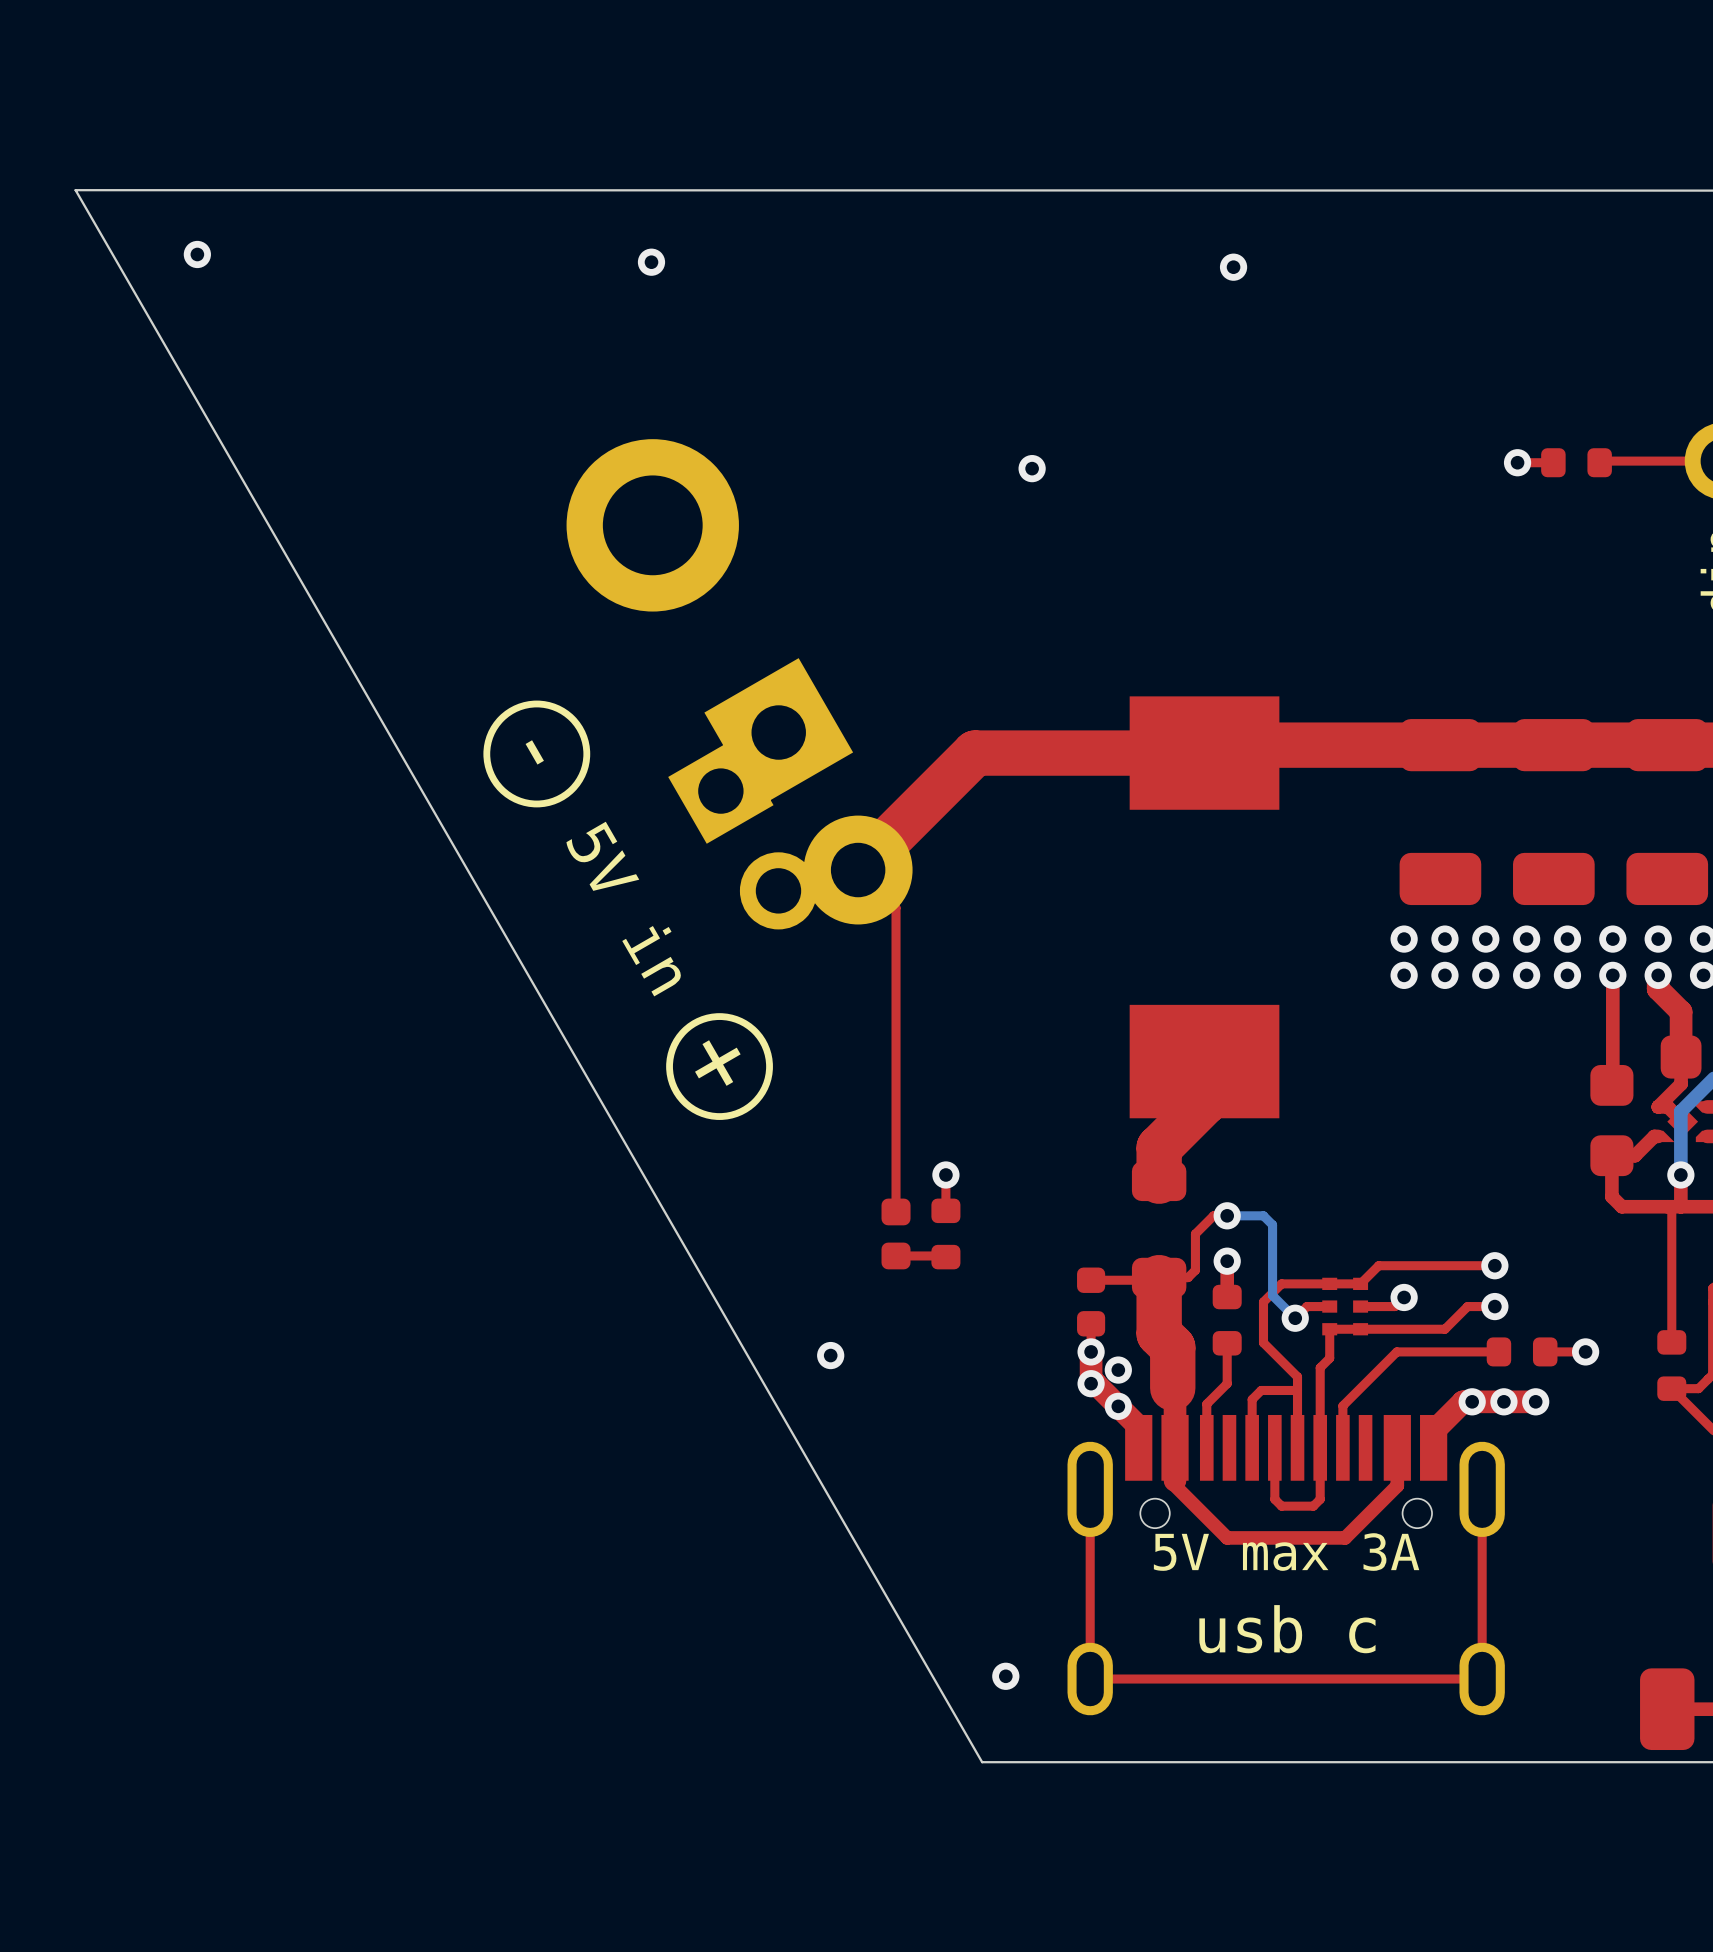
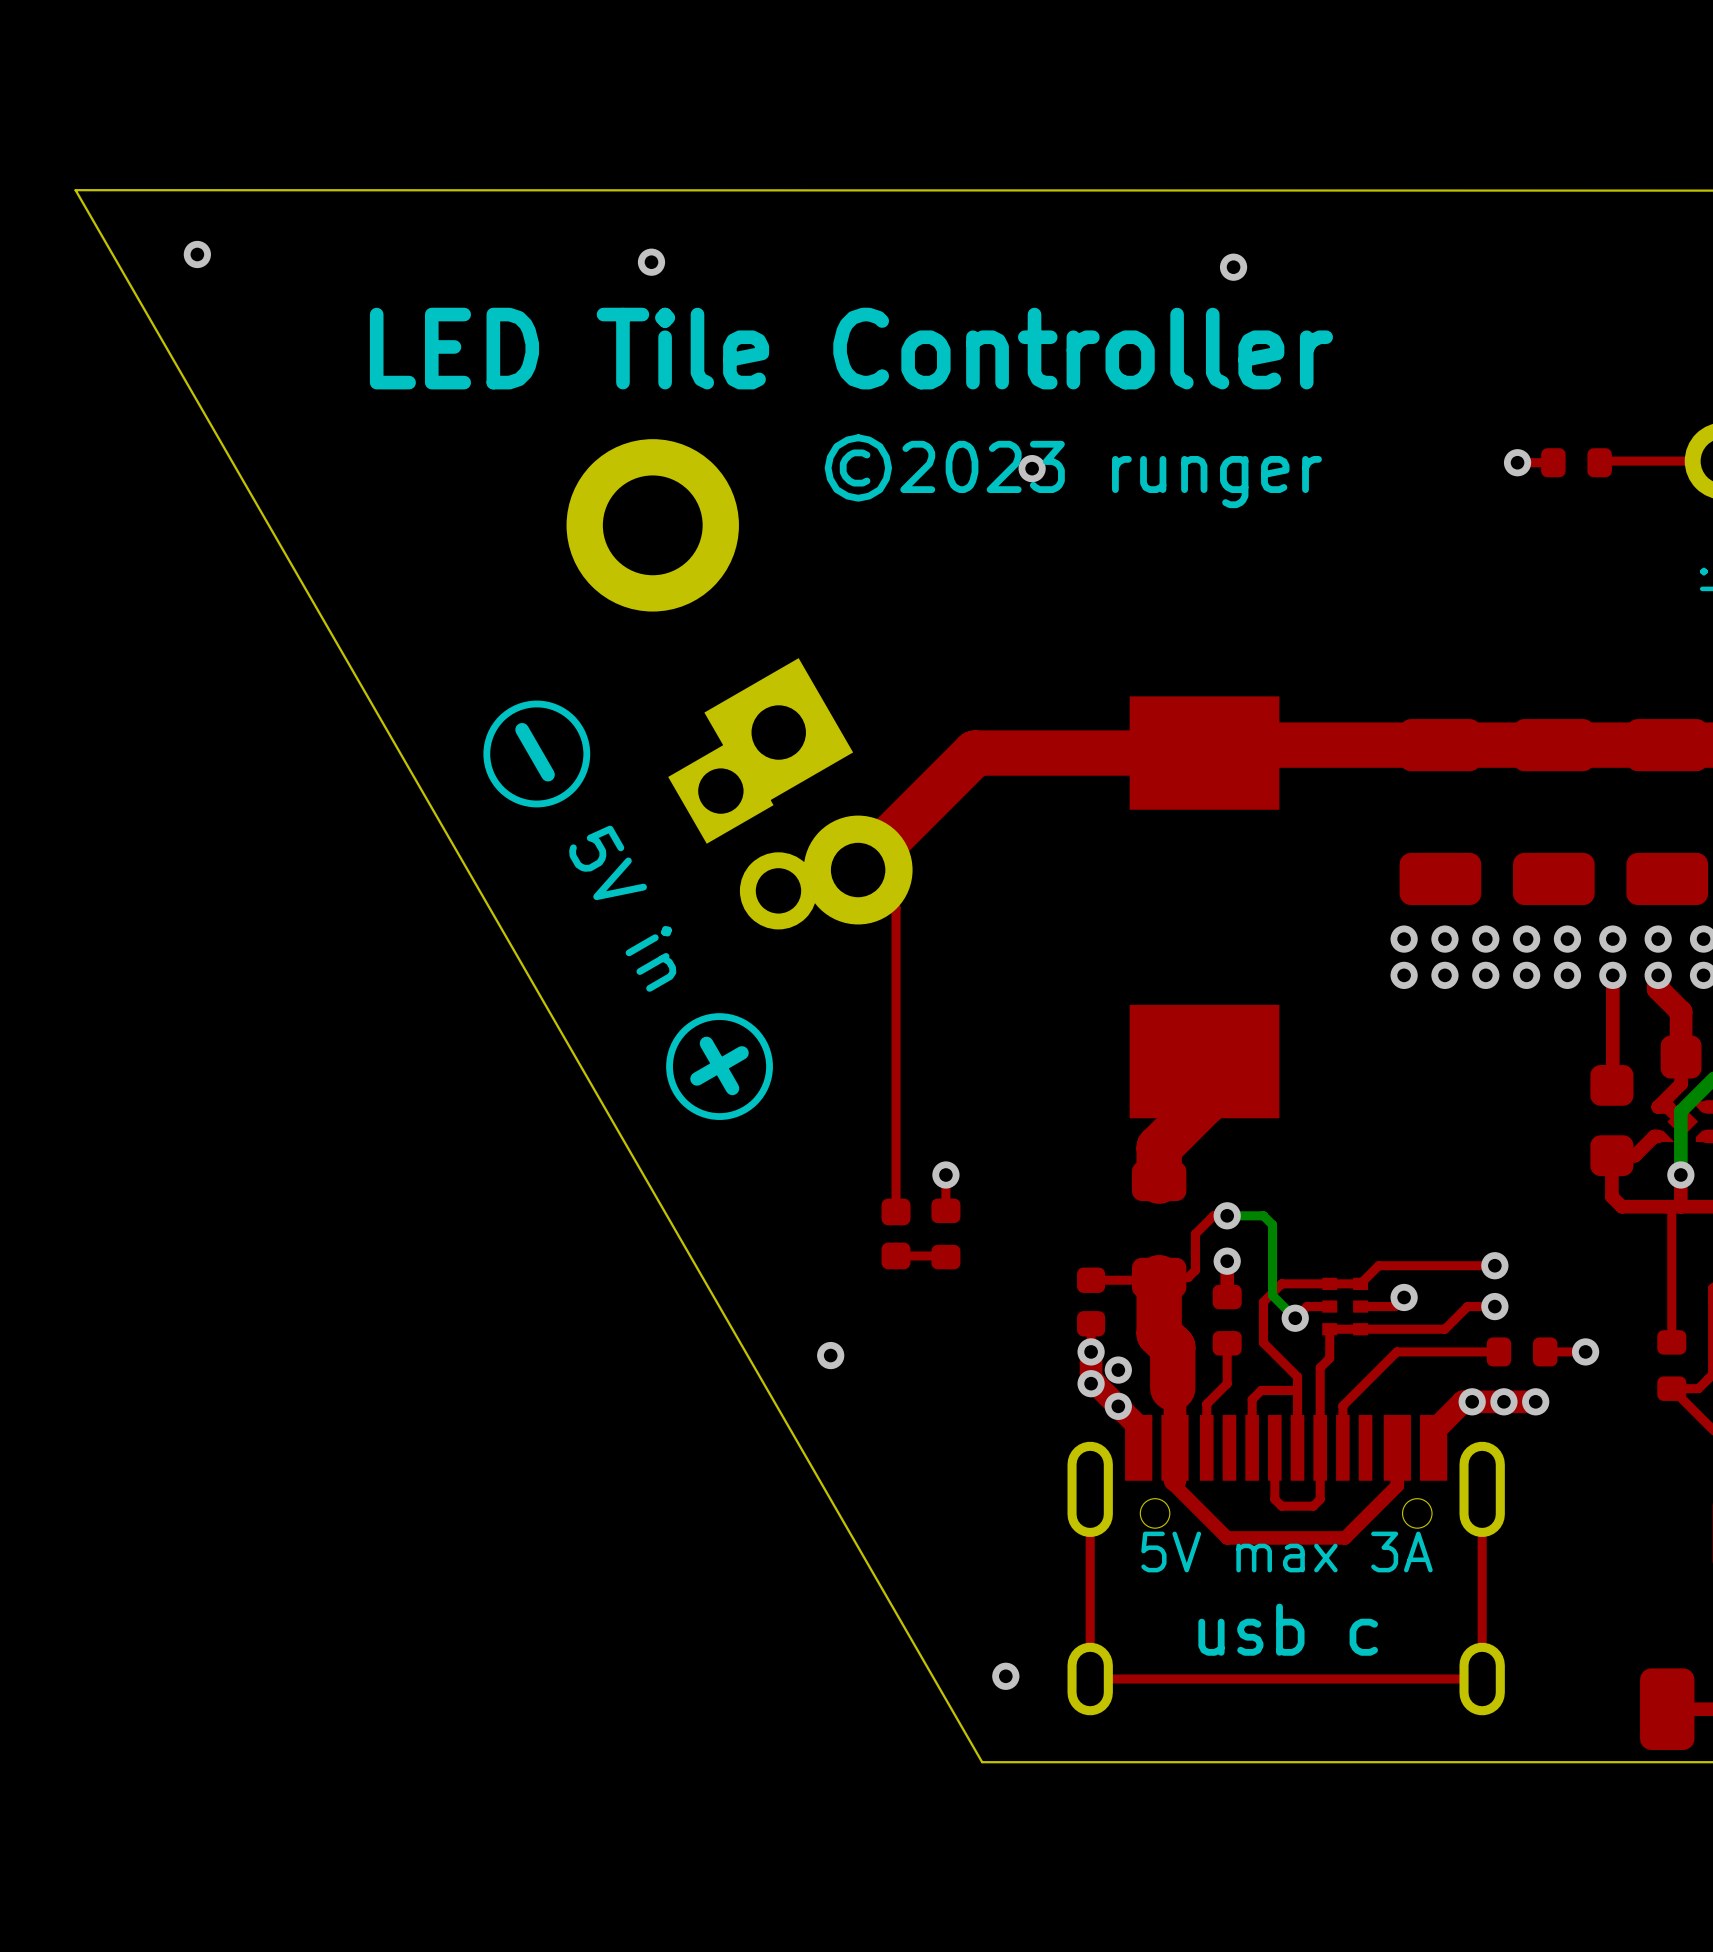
text: none -> LED Tile Controller (851, 348)
text: none -> ©2023 runger (1073, 471)

